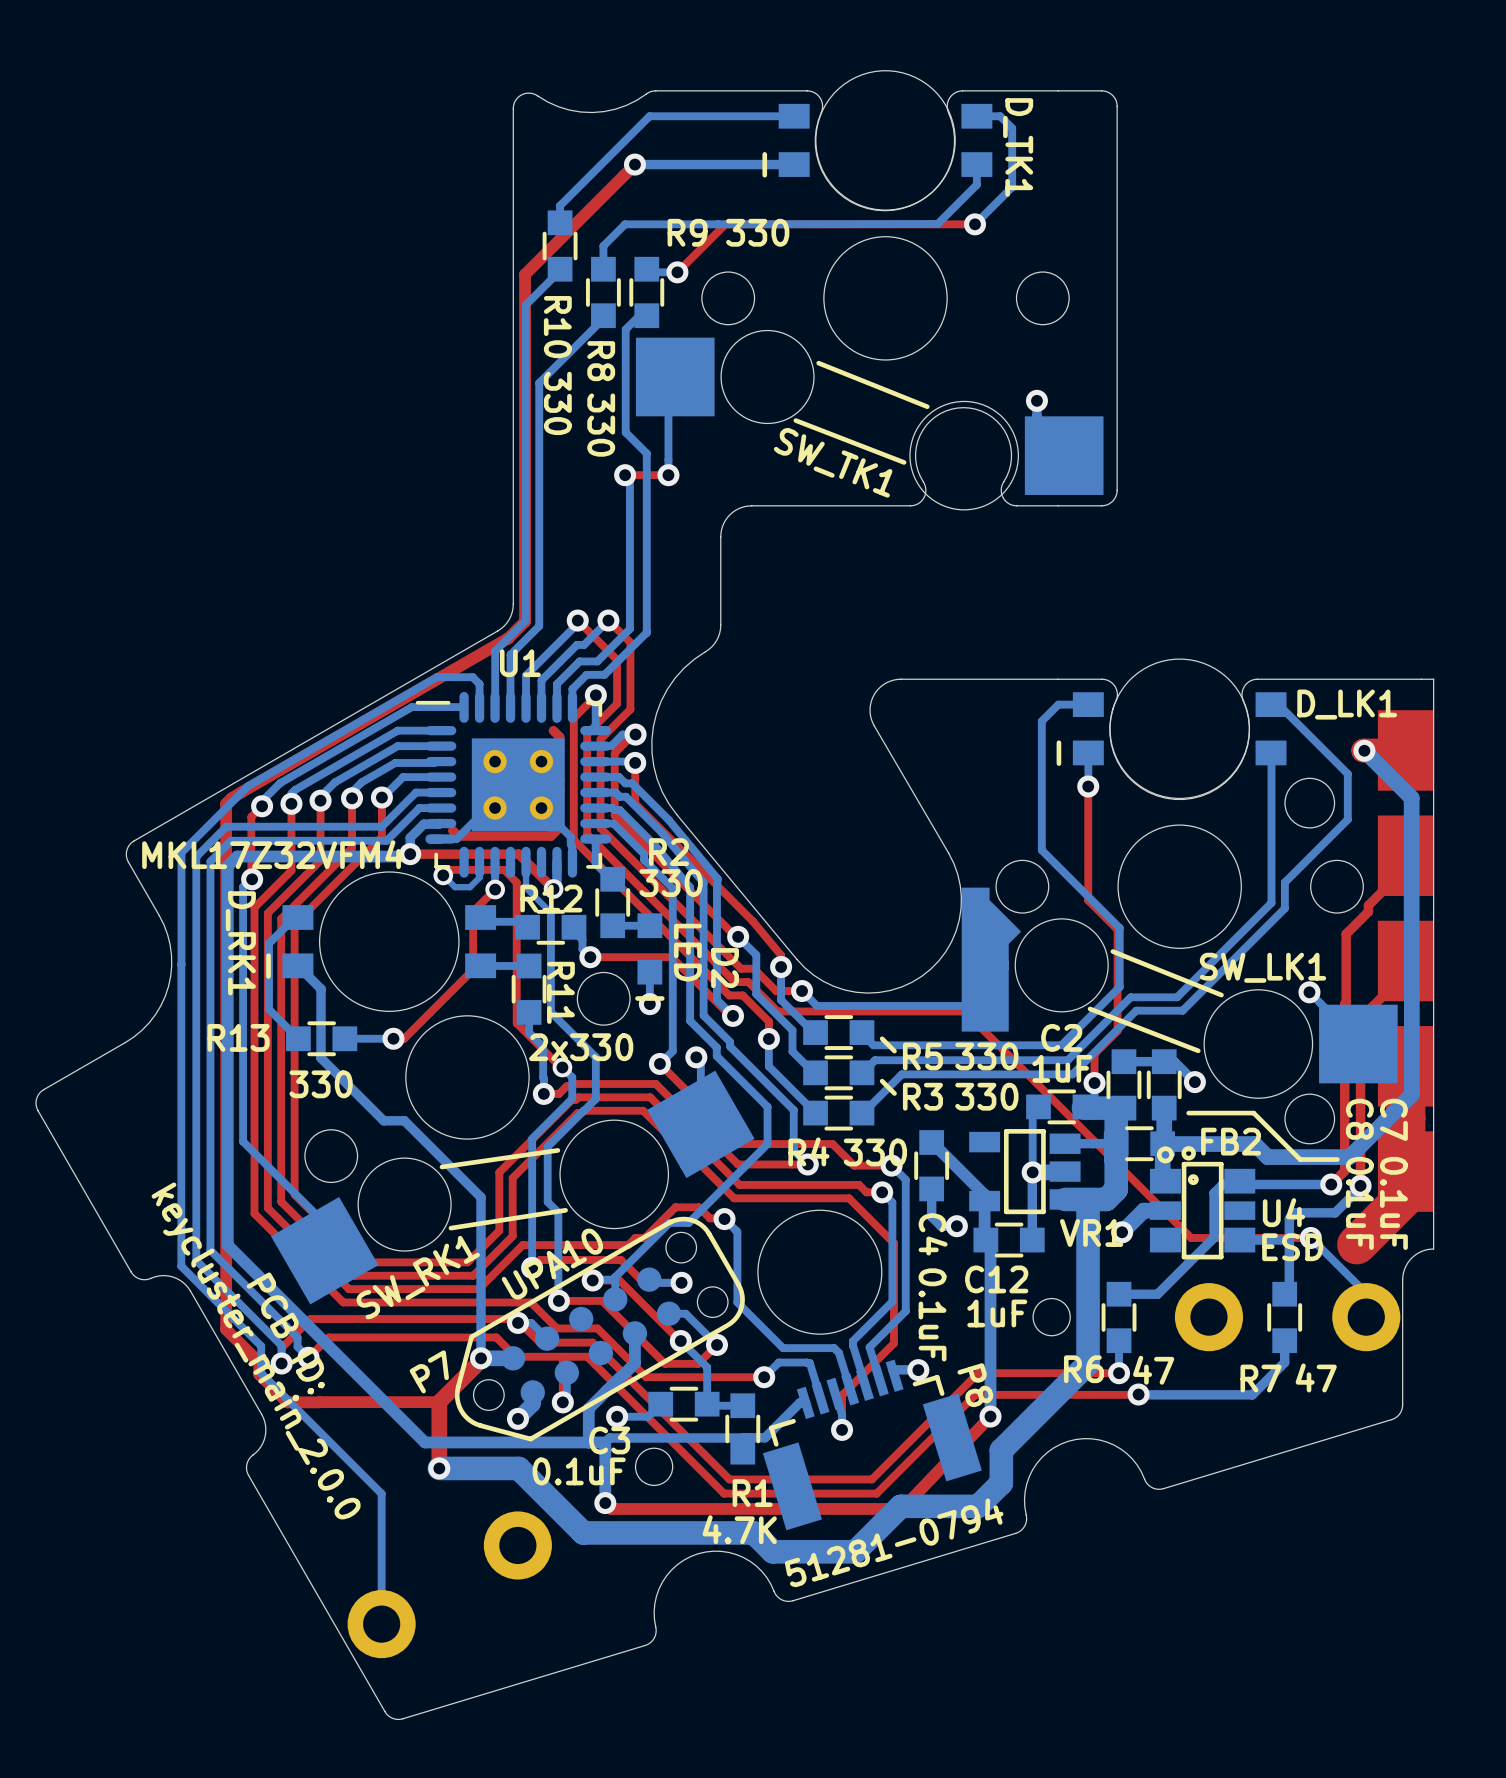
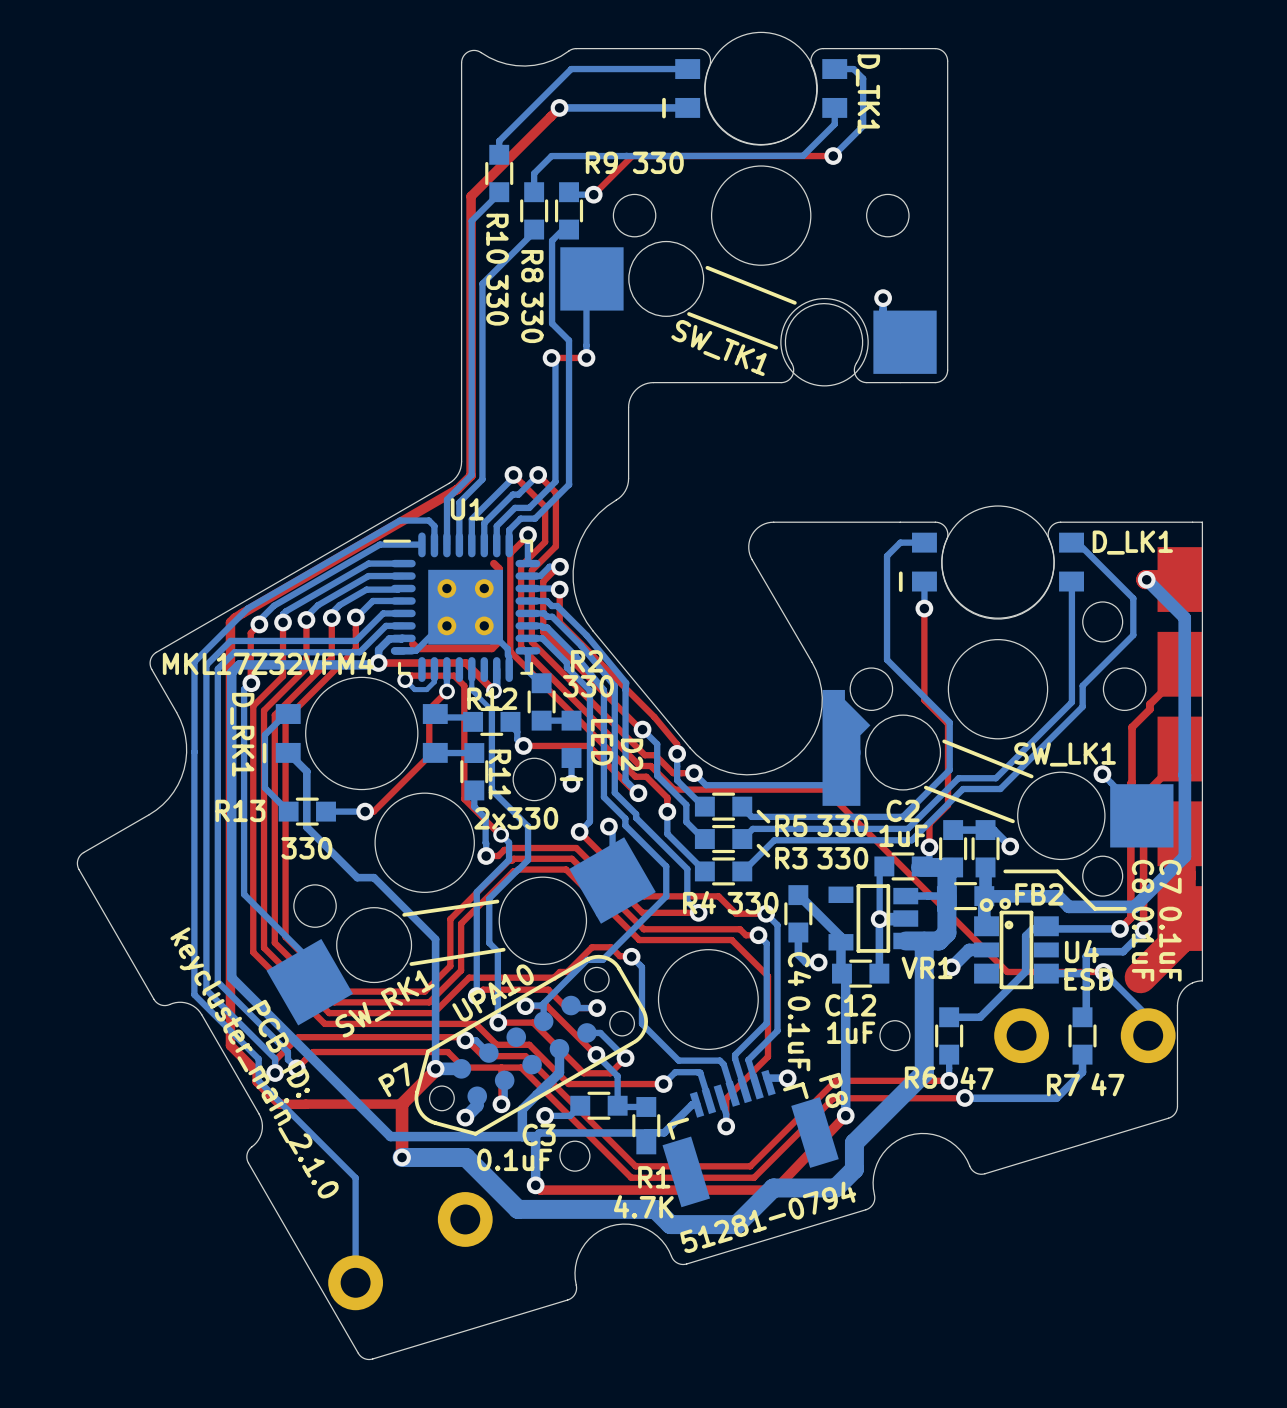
text: keycluster_main_2.0.0 (256, 1350) -> keycluster_main_2.1.0 (254, 1062)

